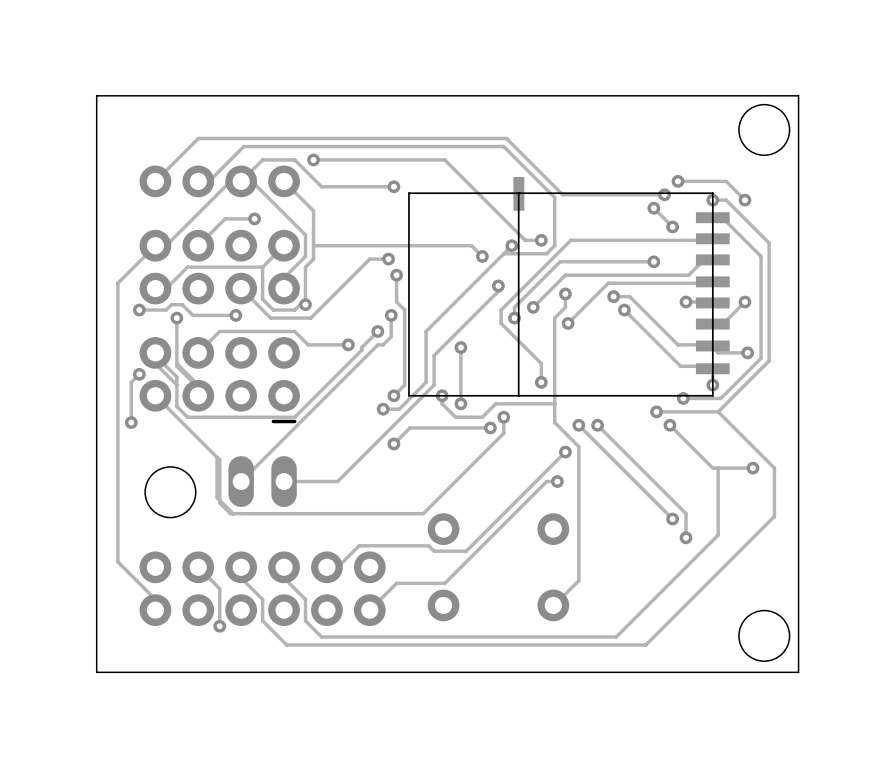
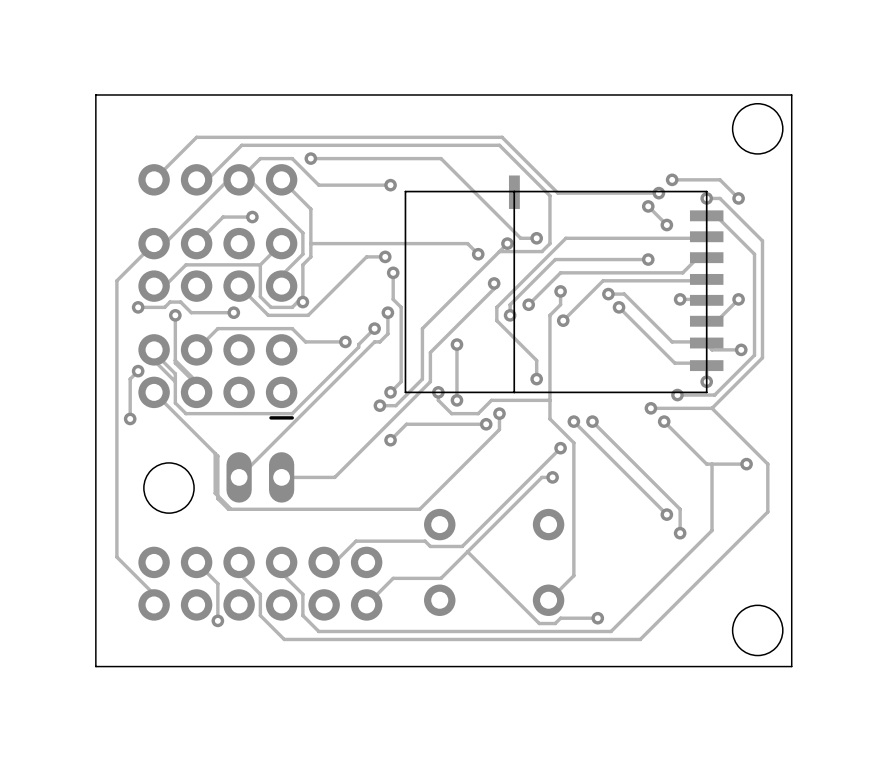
track: none -> (467, 551) (539, 623) (555, 623) (560, 618) (597, 618)
via: none -> (597, 618)

